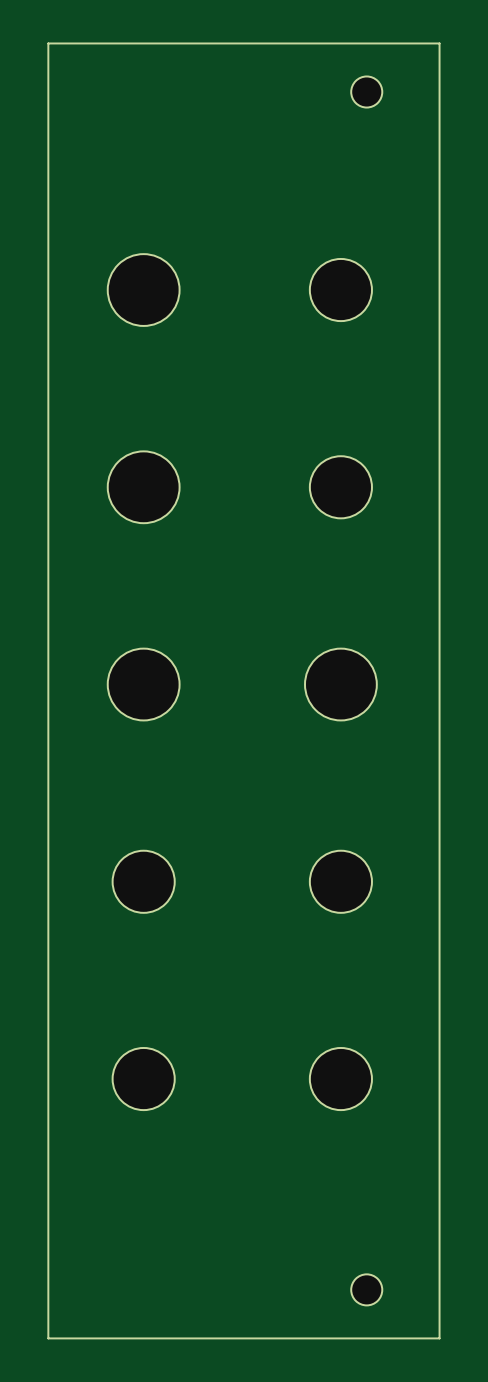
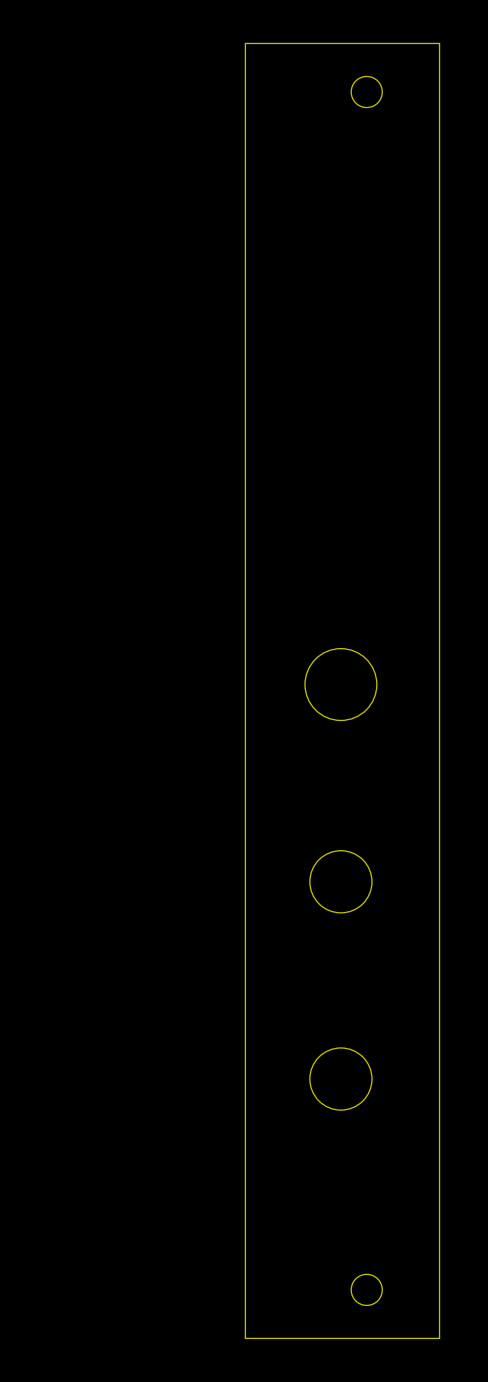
board edge: (245, 43) (48, 43) (48, 1338) (245, 1338) -> (245, 43) (245, 1338)
part: (143, 290) -> none
part: (340, 290) -> none
part: (143, 487) -> none
part: (340, 487) -> none
part: (143, 684) -> none
part: (143, 881) -> none
part: (143, 1079) -> none

